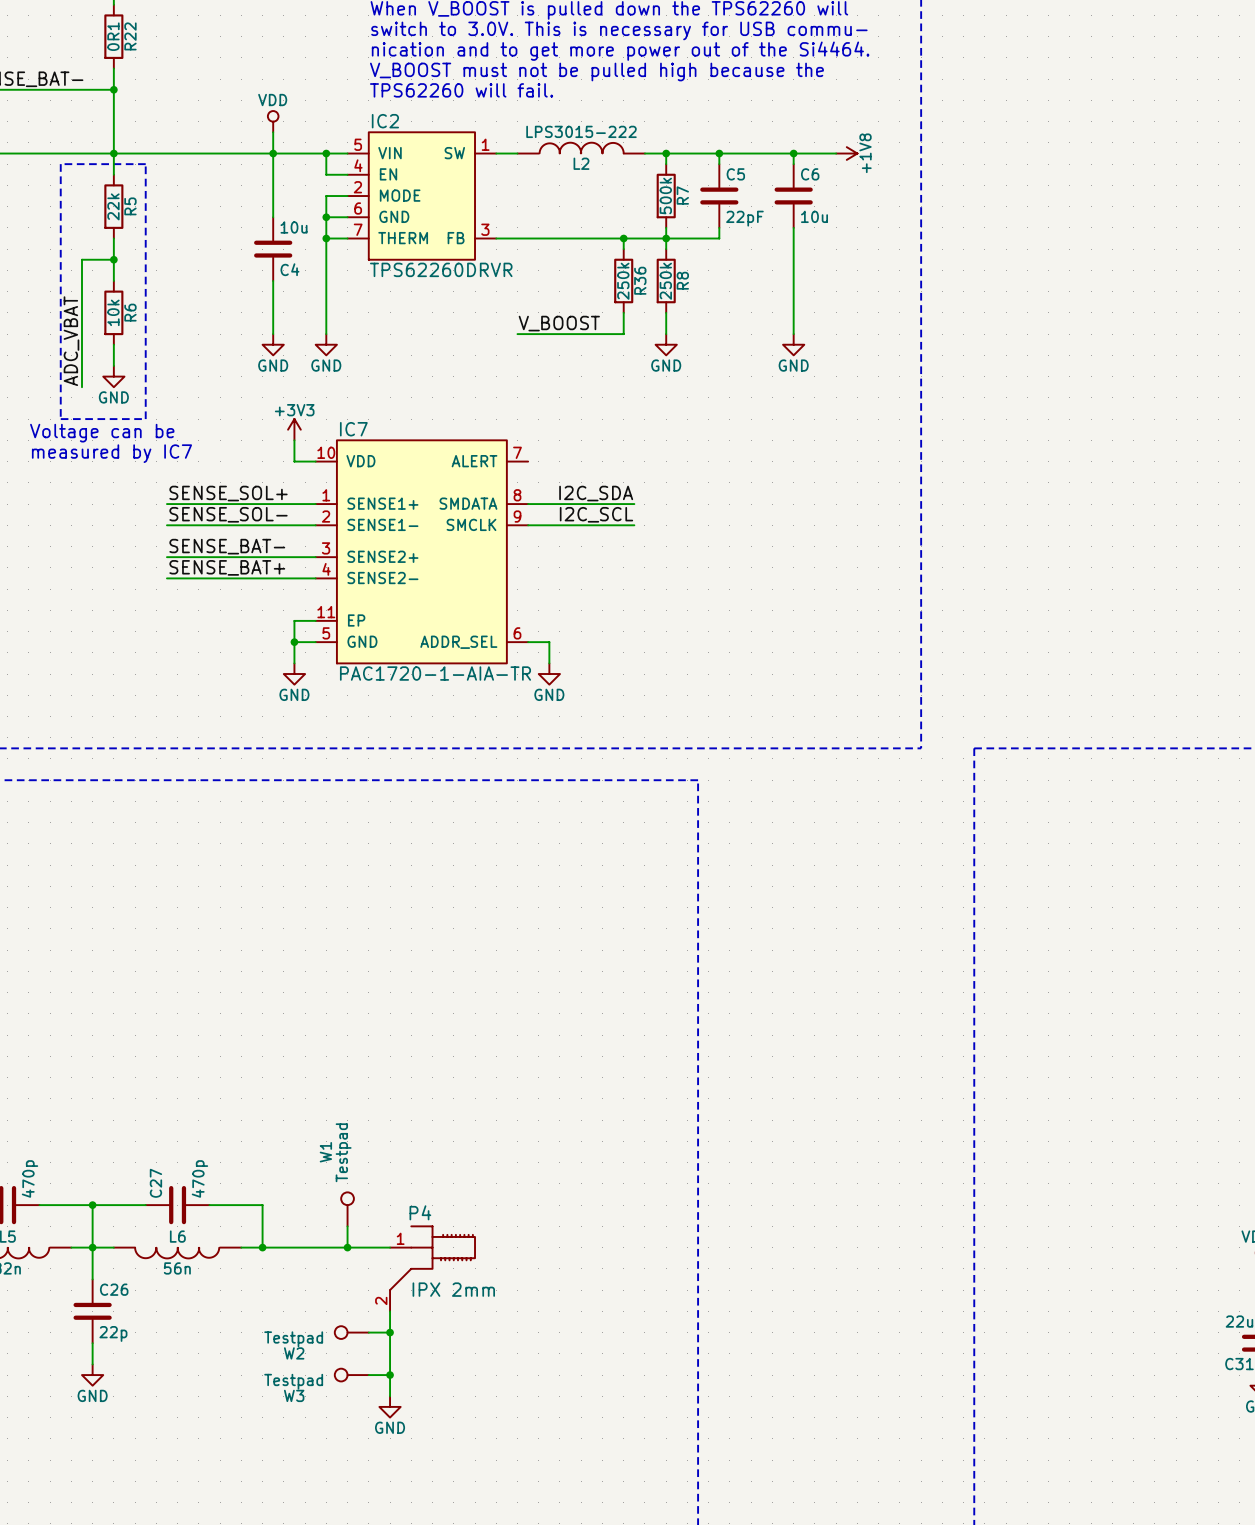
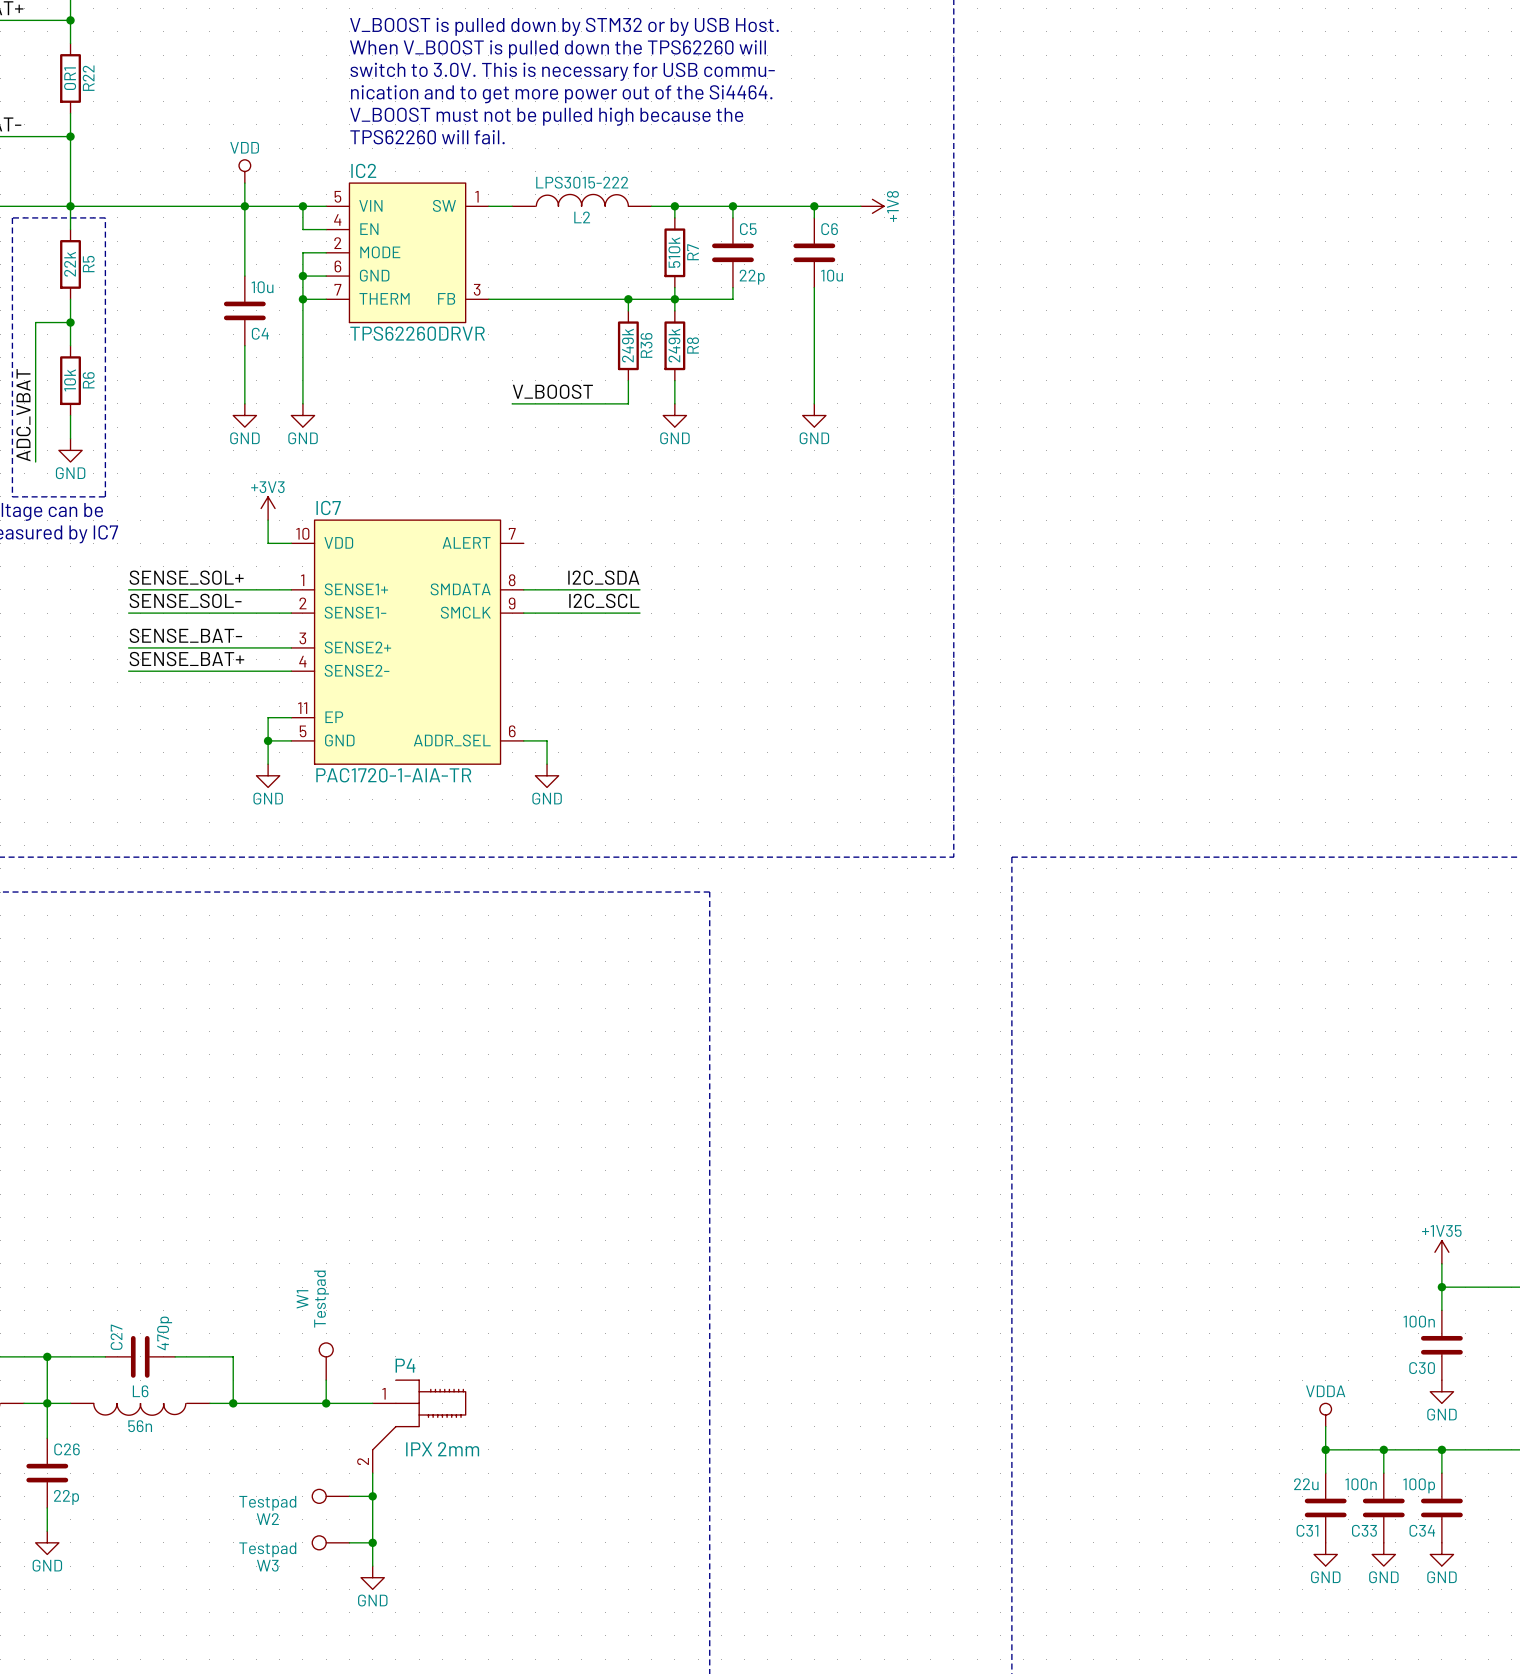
R7 value: 500k (665, 196) -> 510k (674, 252)
C5 value: 22pF (744, 218) -> 22p (752, 277)
R36 value: 250k (623, 281) -> 249k (627, 345)
R8 value: 250k (665, 281) -> 249k (674, 345)

